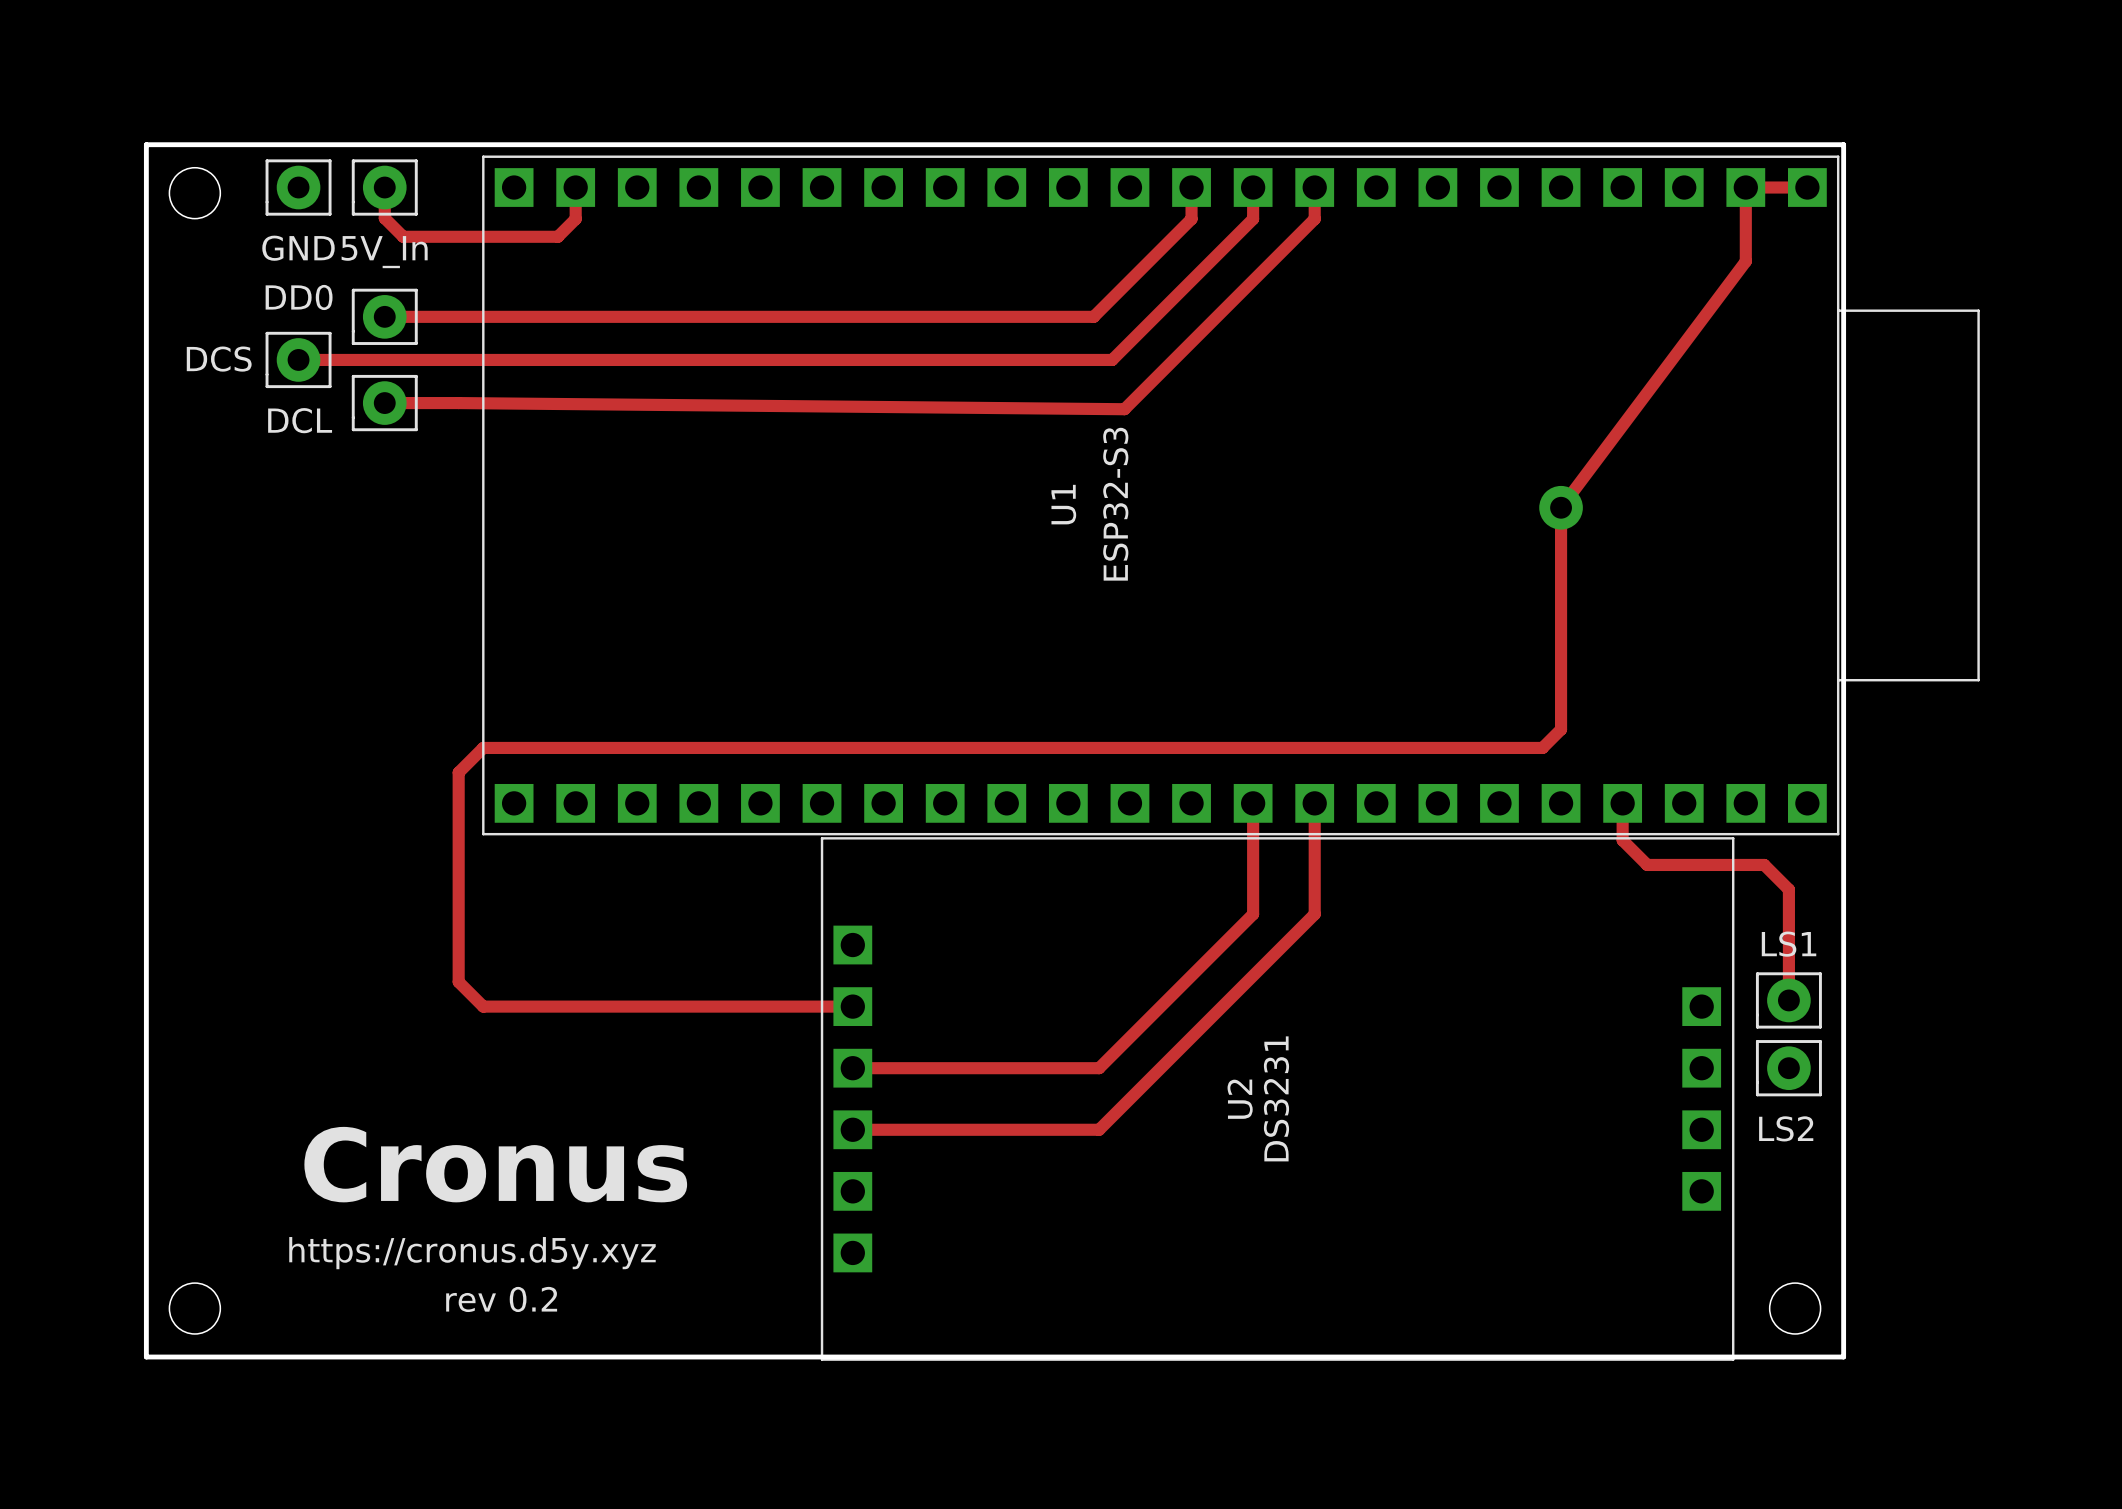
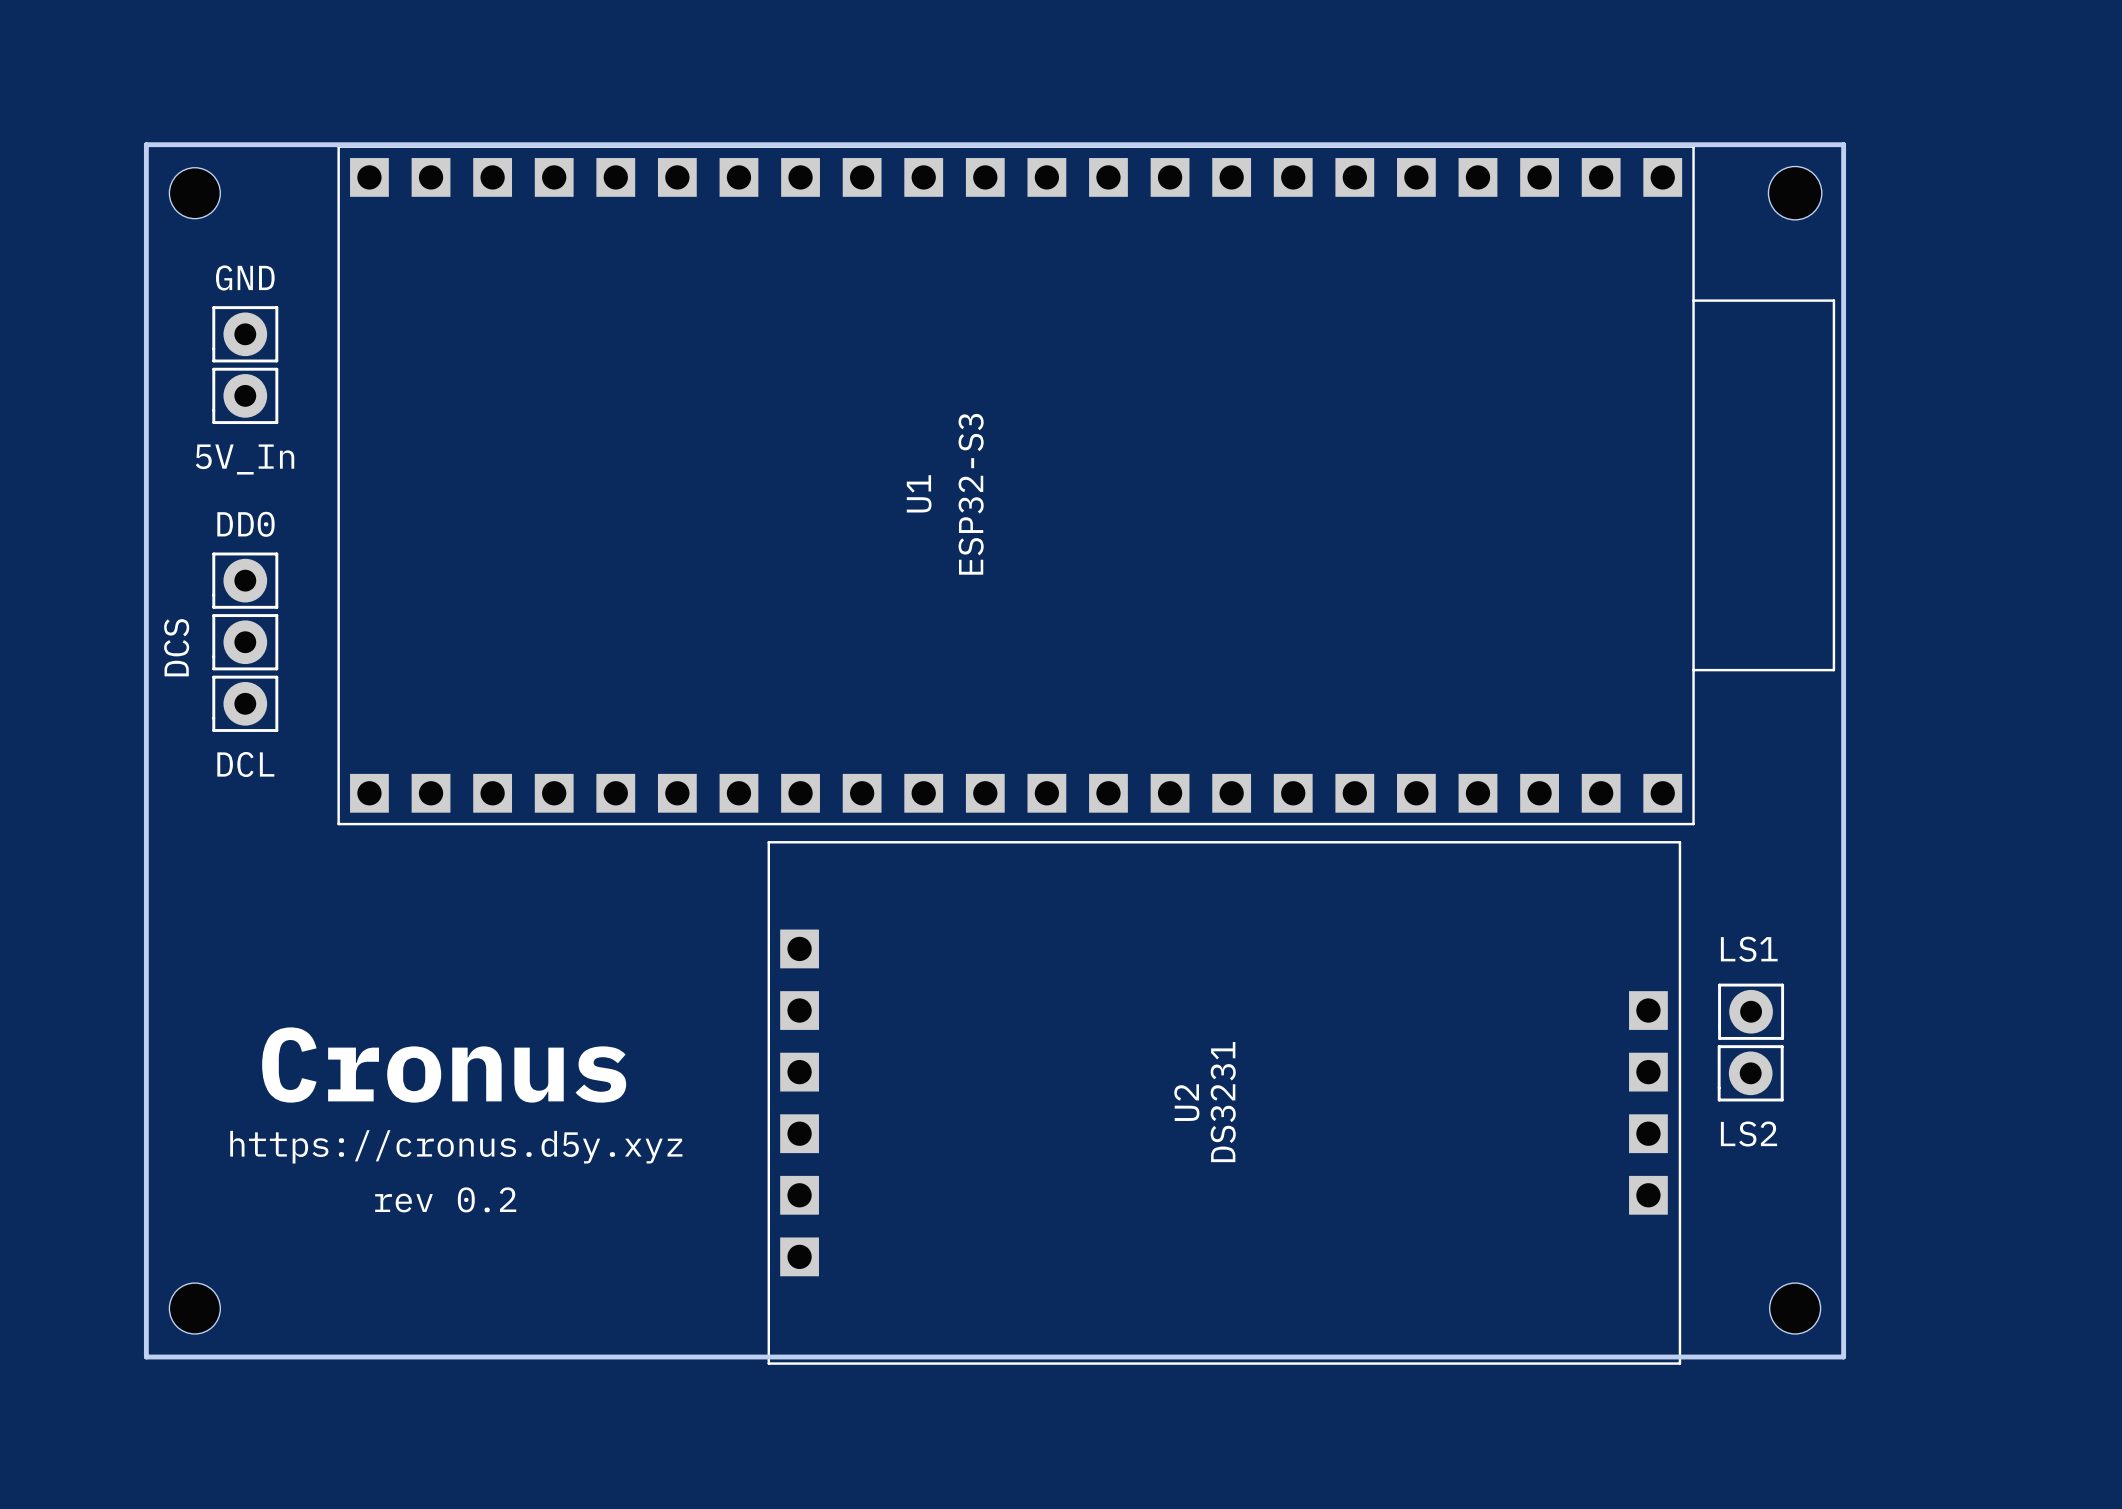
part position: (298, 187) -> (245, 334)
track: (384, 187) (384, 218) (403, 236) (557, 236) (575, 219) (575, 187) -> none
part position: (384, 187) -> (245, 395)
track: (1191, 187) (1191, 219) (1093, 316) (384, 316) -> none
track: (1253, 187) (1253, 219) (1112, 359) (298, 359) -> none
track: (1314, 187) (1314, 219) (1124, 409) (384, 403) -> none
track: (1807, 187) (1745, 187) (1745, 261) (1561, 507) (1561, 729) (1542, 747) (483, 747) (458, 772) (458, 981) (483, 1006) (852, 1006) -> none
part: none -> (1795, 193)
part value position: GND (298, 248) -> GND (245, 277)
part value position: DD0 (299, 297) -> DD0 (245, 524)
part position: (384, 316) -> (245, 580)
part value rotation: 0° (219, 359) -> 90° counterclockwise (176, 647)
part position: (298, 359) -> (245, 642)
part position: (384, 403) -> (245, 703)
part value position: DCL (300, 420) -> DCL (245, 764)
U1 position: (1230, 495) -> (1086, 485)
via: (1561, 507) -> none
track: (1253, 803) (1253, 914) (1099, 1068) (852, 1068) -> none
track: (1314, 803) (1314, 914) (1099, 1129) (852, 1129) -> none
track: (1622, 803) (1622, 840) (1647, 864) (1764, 864) (1788, 889) (1788, 1000) -> none
part value position: LS1 (1789, 944) -> LS1 (1749, 949)
part position: (1788, 1000) -> (1751, 1011)
part position: (1788, 1068) -> (1750, 1073)
U2 position: (1277, 1098) -> (1224, 1102)
text position: Cronus (495, 1164) -> Cronus (444, 1065)
text position: https://cronus.d5y.xyz (472, 1253) -> https://cronus.d5y.xyz (456, 1146)
text position: rev 0.2 (501, 1299) -> rev 0.2 (445, 1199)

